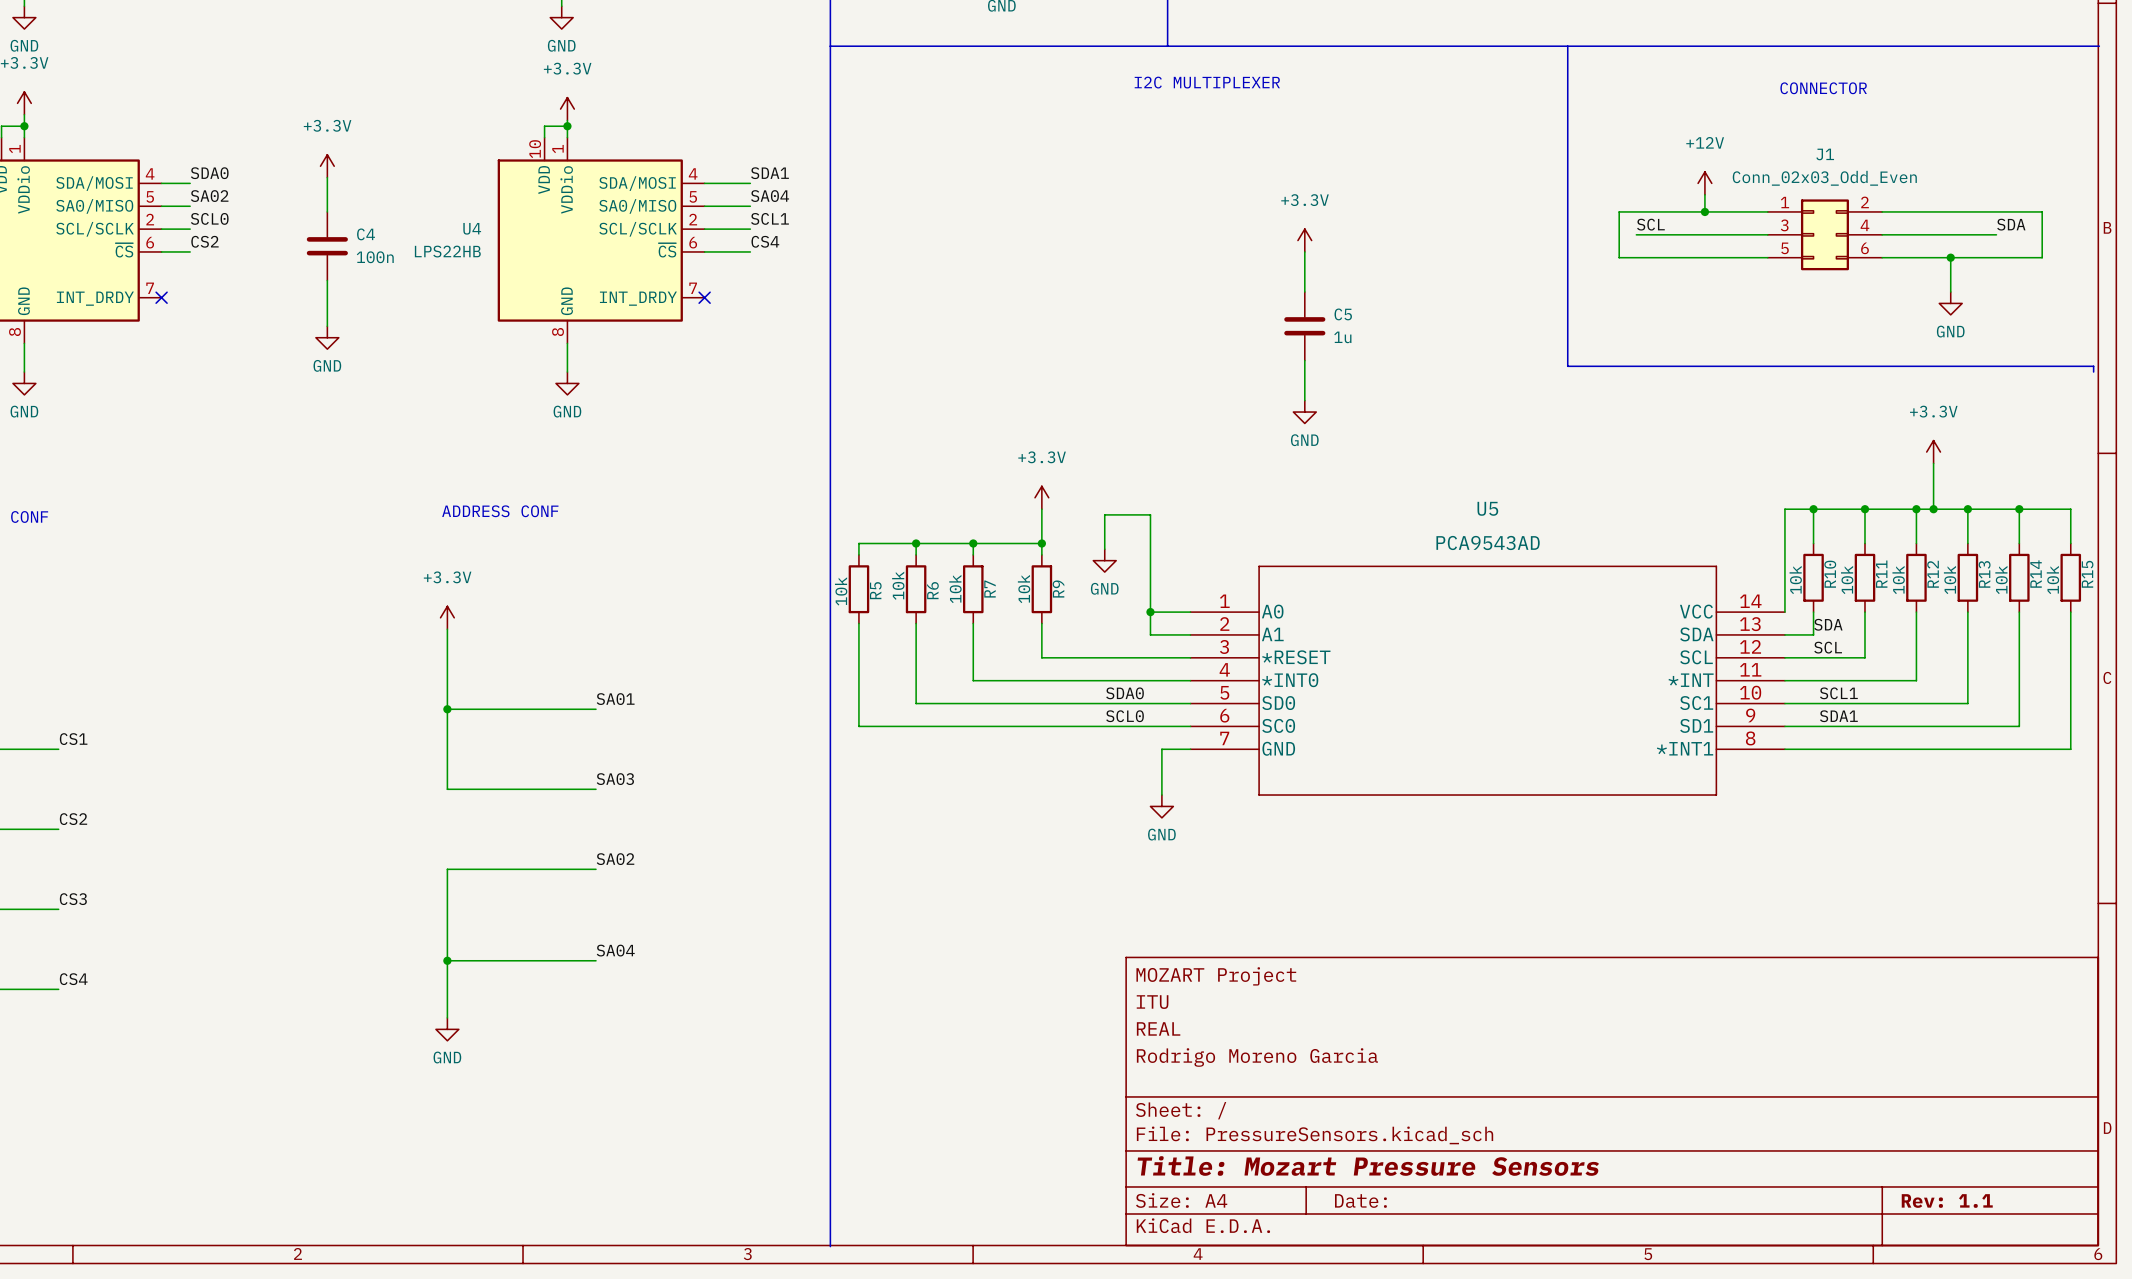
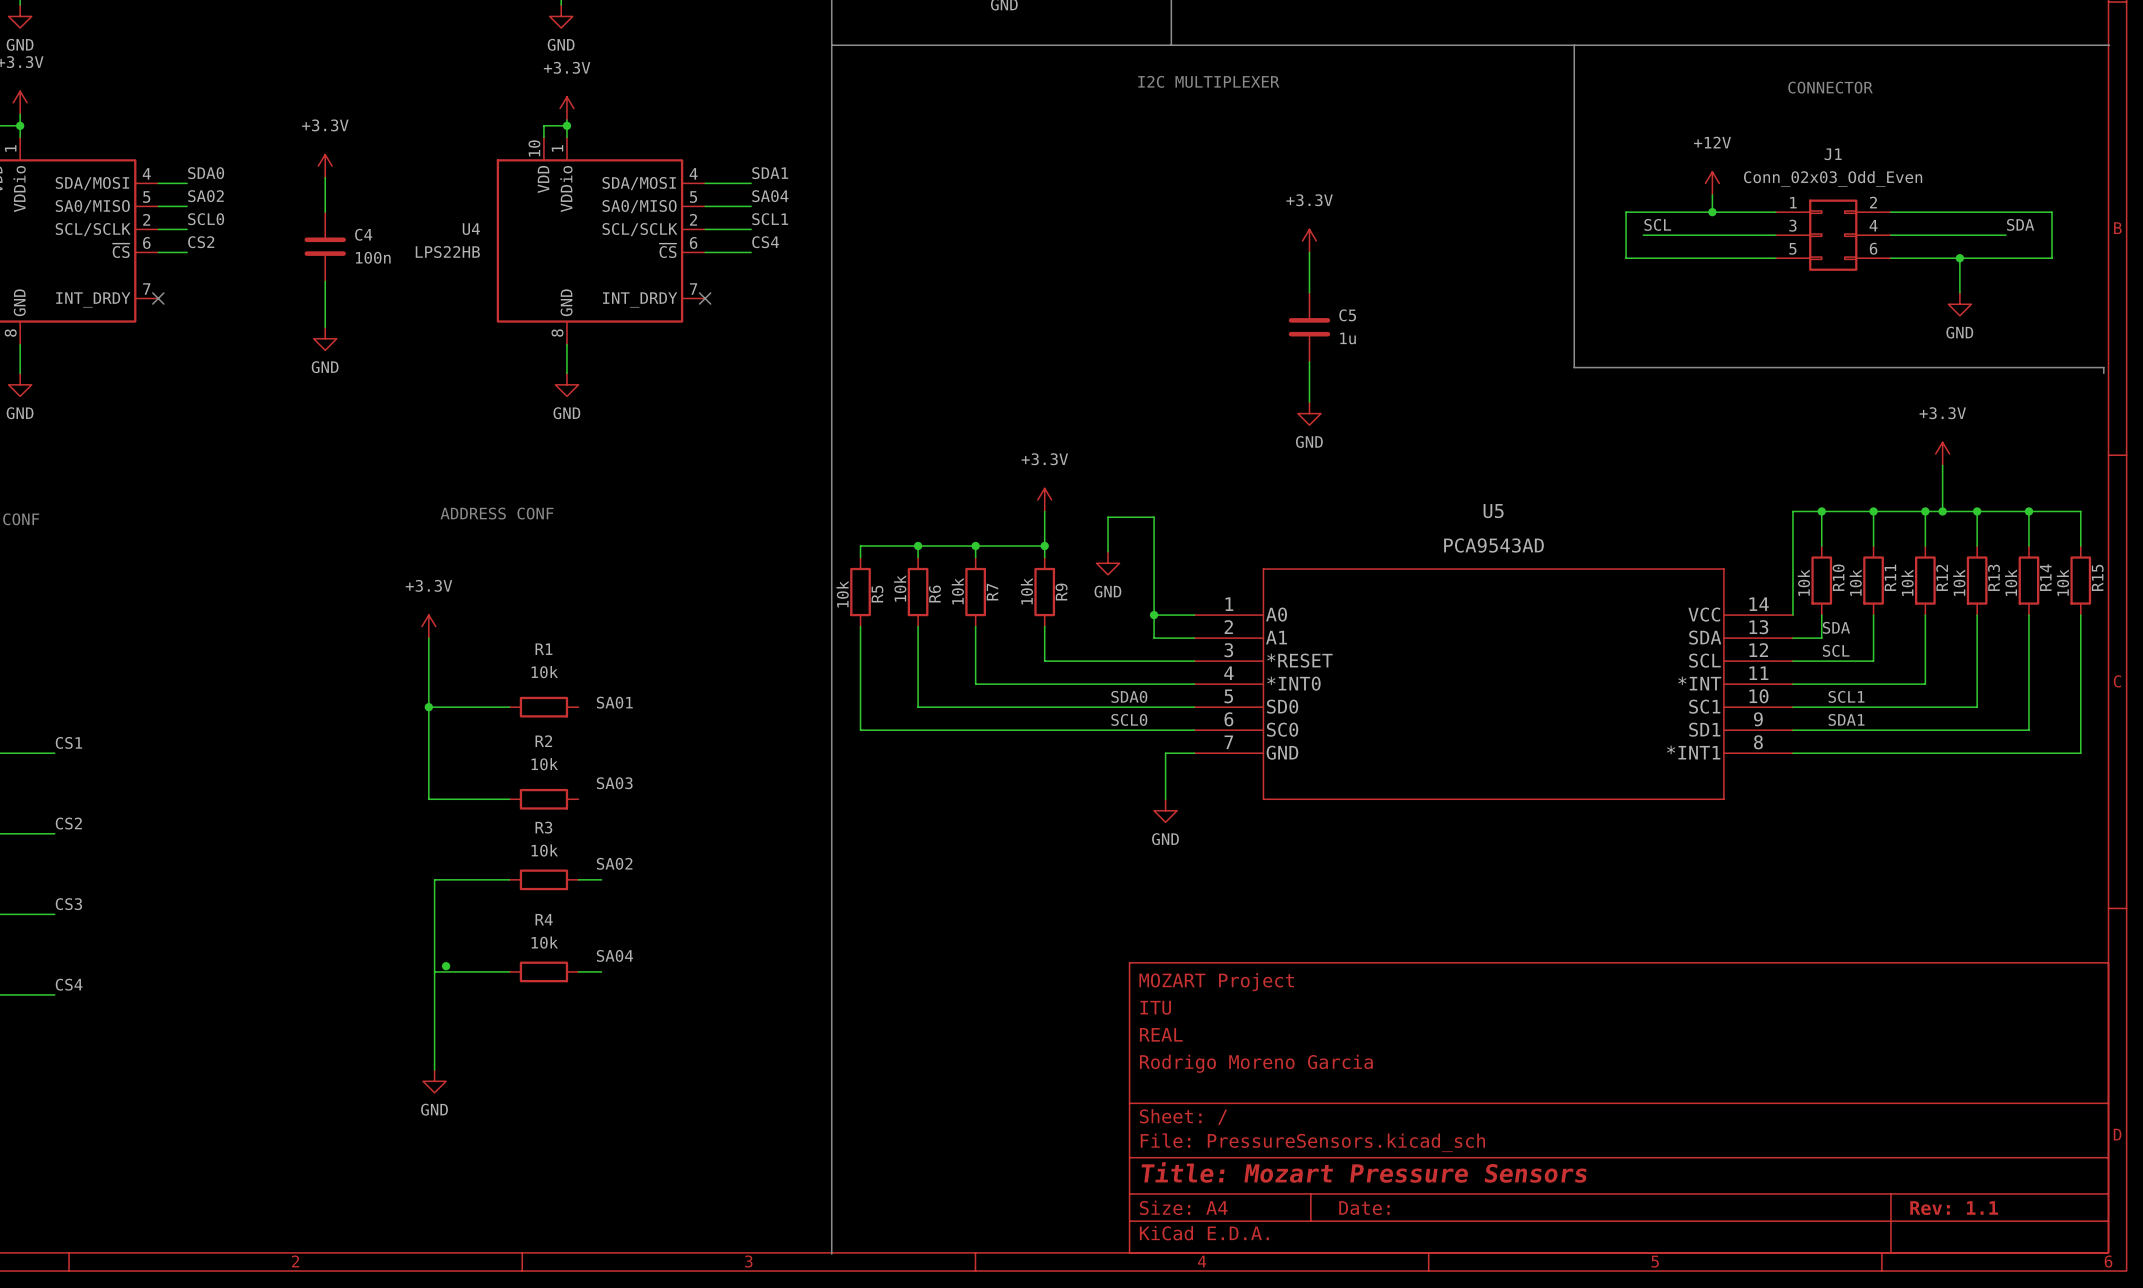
power symbol position: +3.3V (447, 617) -> +3.3V (428, 626)
wire: (447, 629) (447, 789) (596, 789) -> none
wire: none -> (428, 638) (428, 799) (509, 799)
wire: none -> (428, 707) (509, 707)
R1: none -> 10k (543, 707)
wire: (447, 709) (596, 709) -> none
junction position: (447, 709) -> (428, 707)
R2: none -> 10k (543, 799)
wire: (596, 869) (447, 869) (447, 1017) -> none
wire: none -> (509, 879) (434, 879) (434, 1069)
R3: none -> 10k (543, 879)
wire: none -> (578, 879) (601, 879)
wire: (447, 960) (596, 960) -> none
wire: none -> (434, 971) (509, 971)
R4: none -> 10k (543, 971)
wire: none -> (578, 971) (601, 971)
power symbol position: GND (447, 1029) -> GND (434, 1081)

